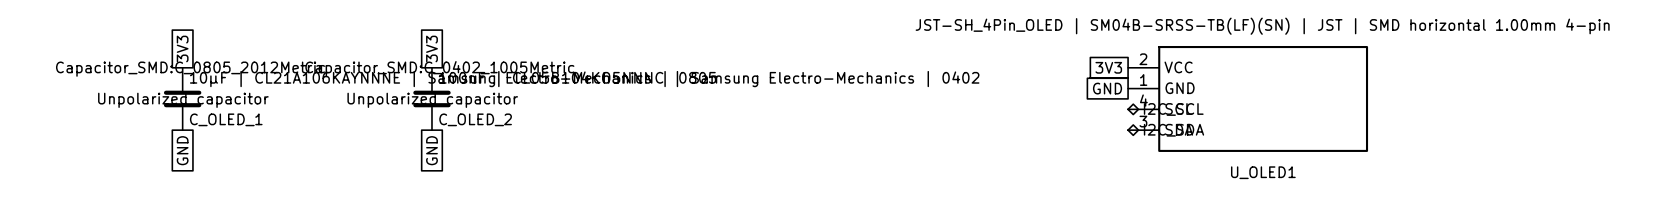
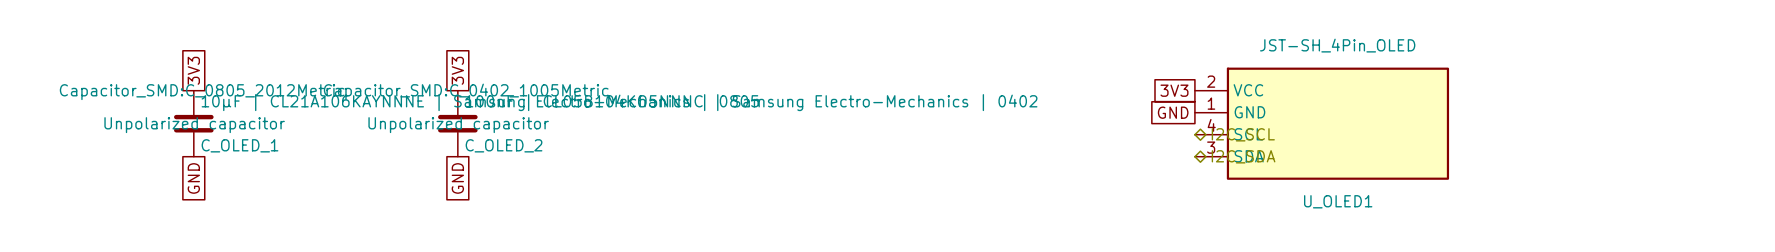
U_OLED1 value: JST-SH_4Pin_OLED | SM04B-SRSS-TB(LF)(SN) | JST | SMD horizontal 1.00mm 4-pin (1262, 26) -> JST-SH_4Pin_OLED (1337, 45)

